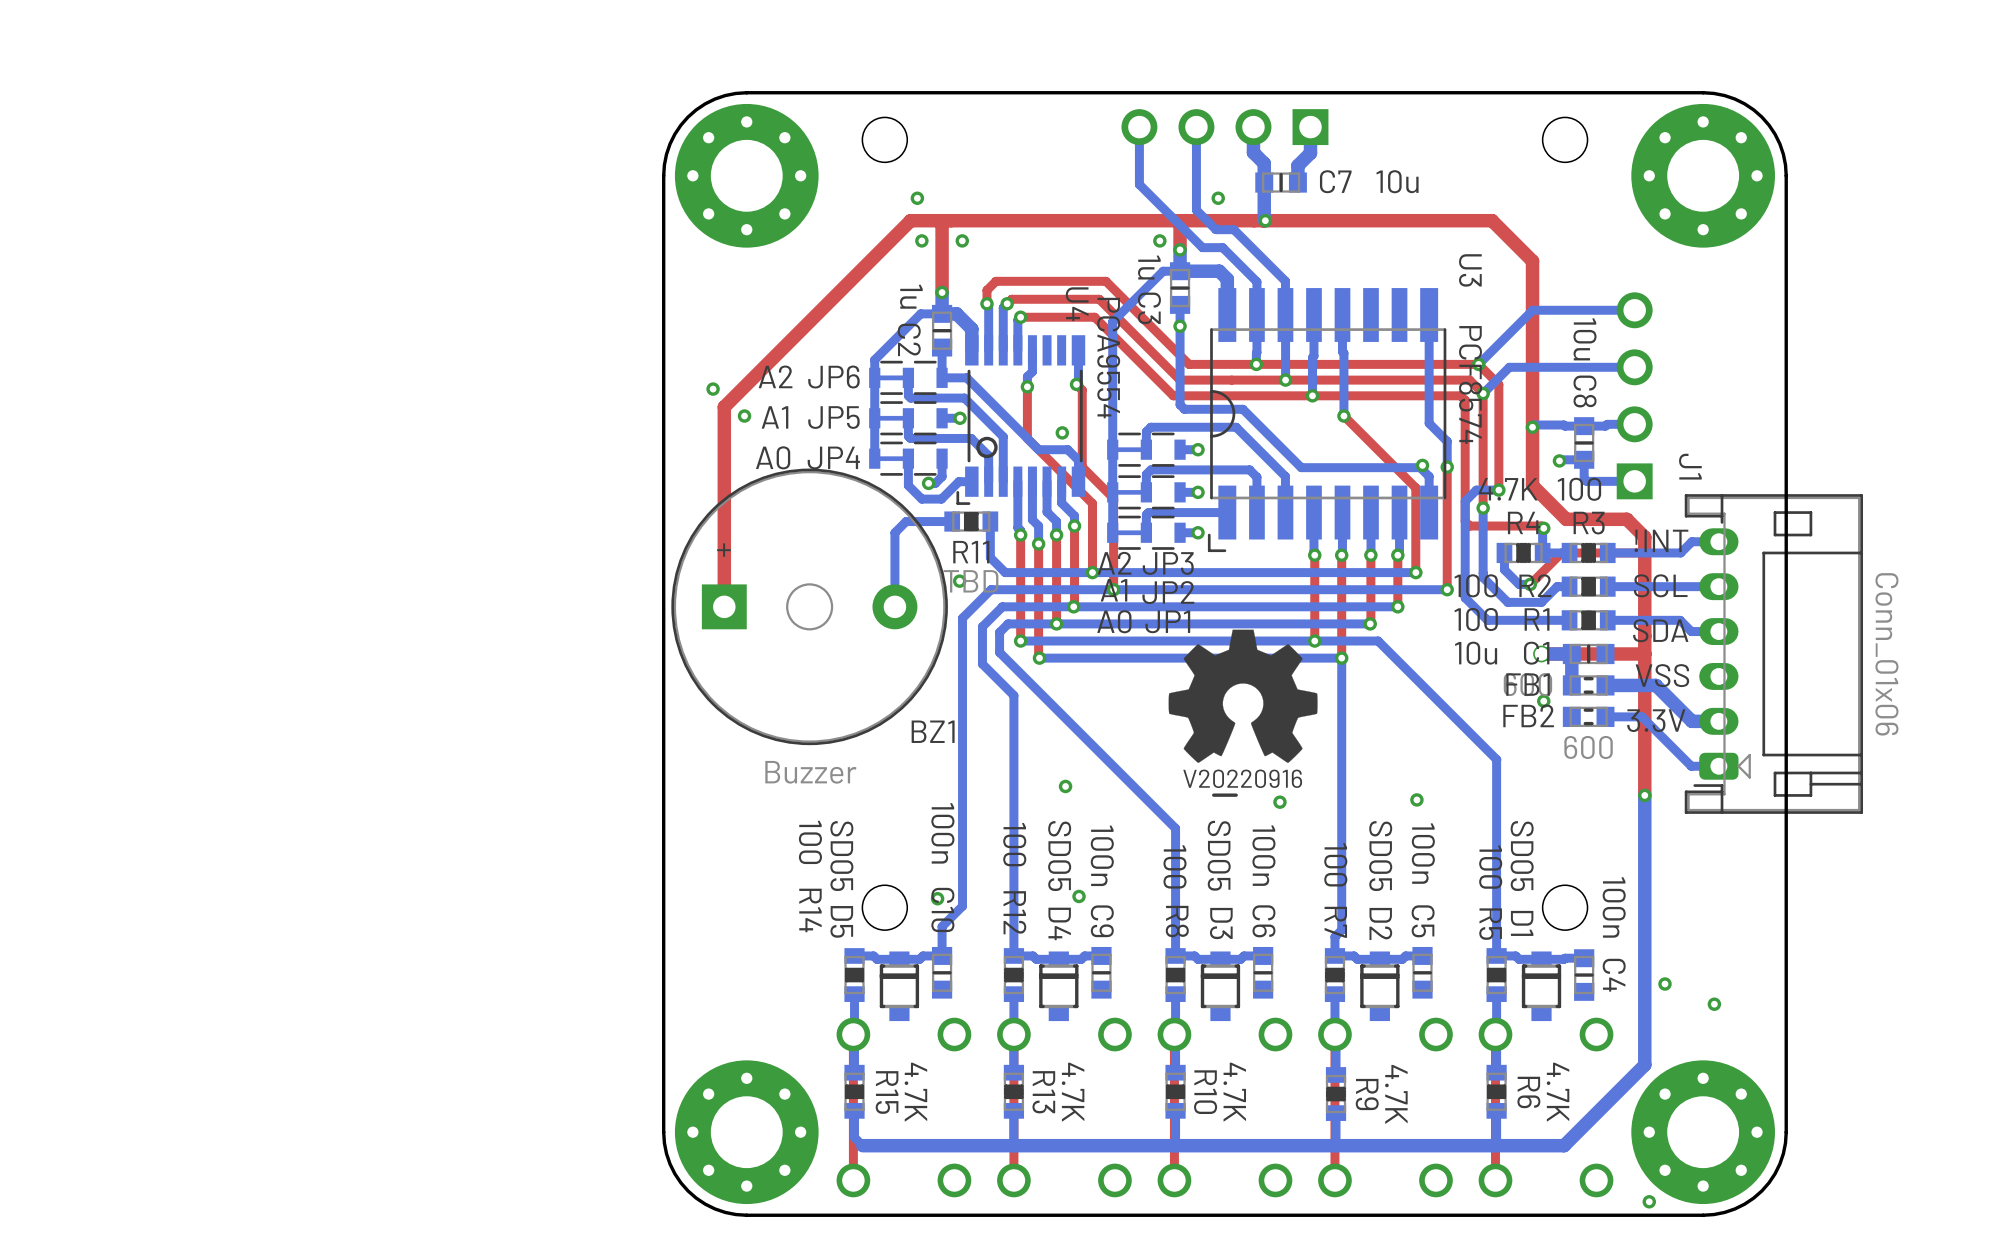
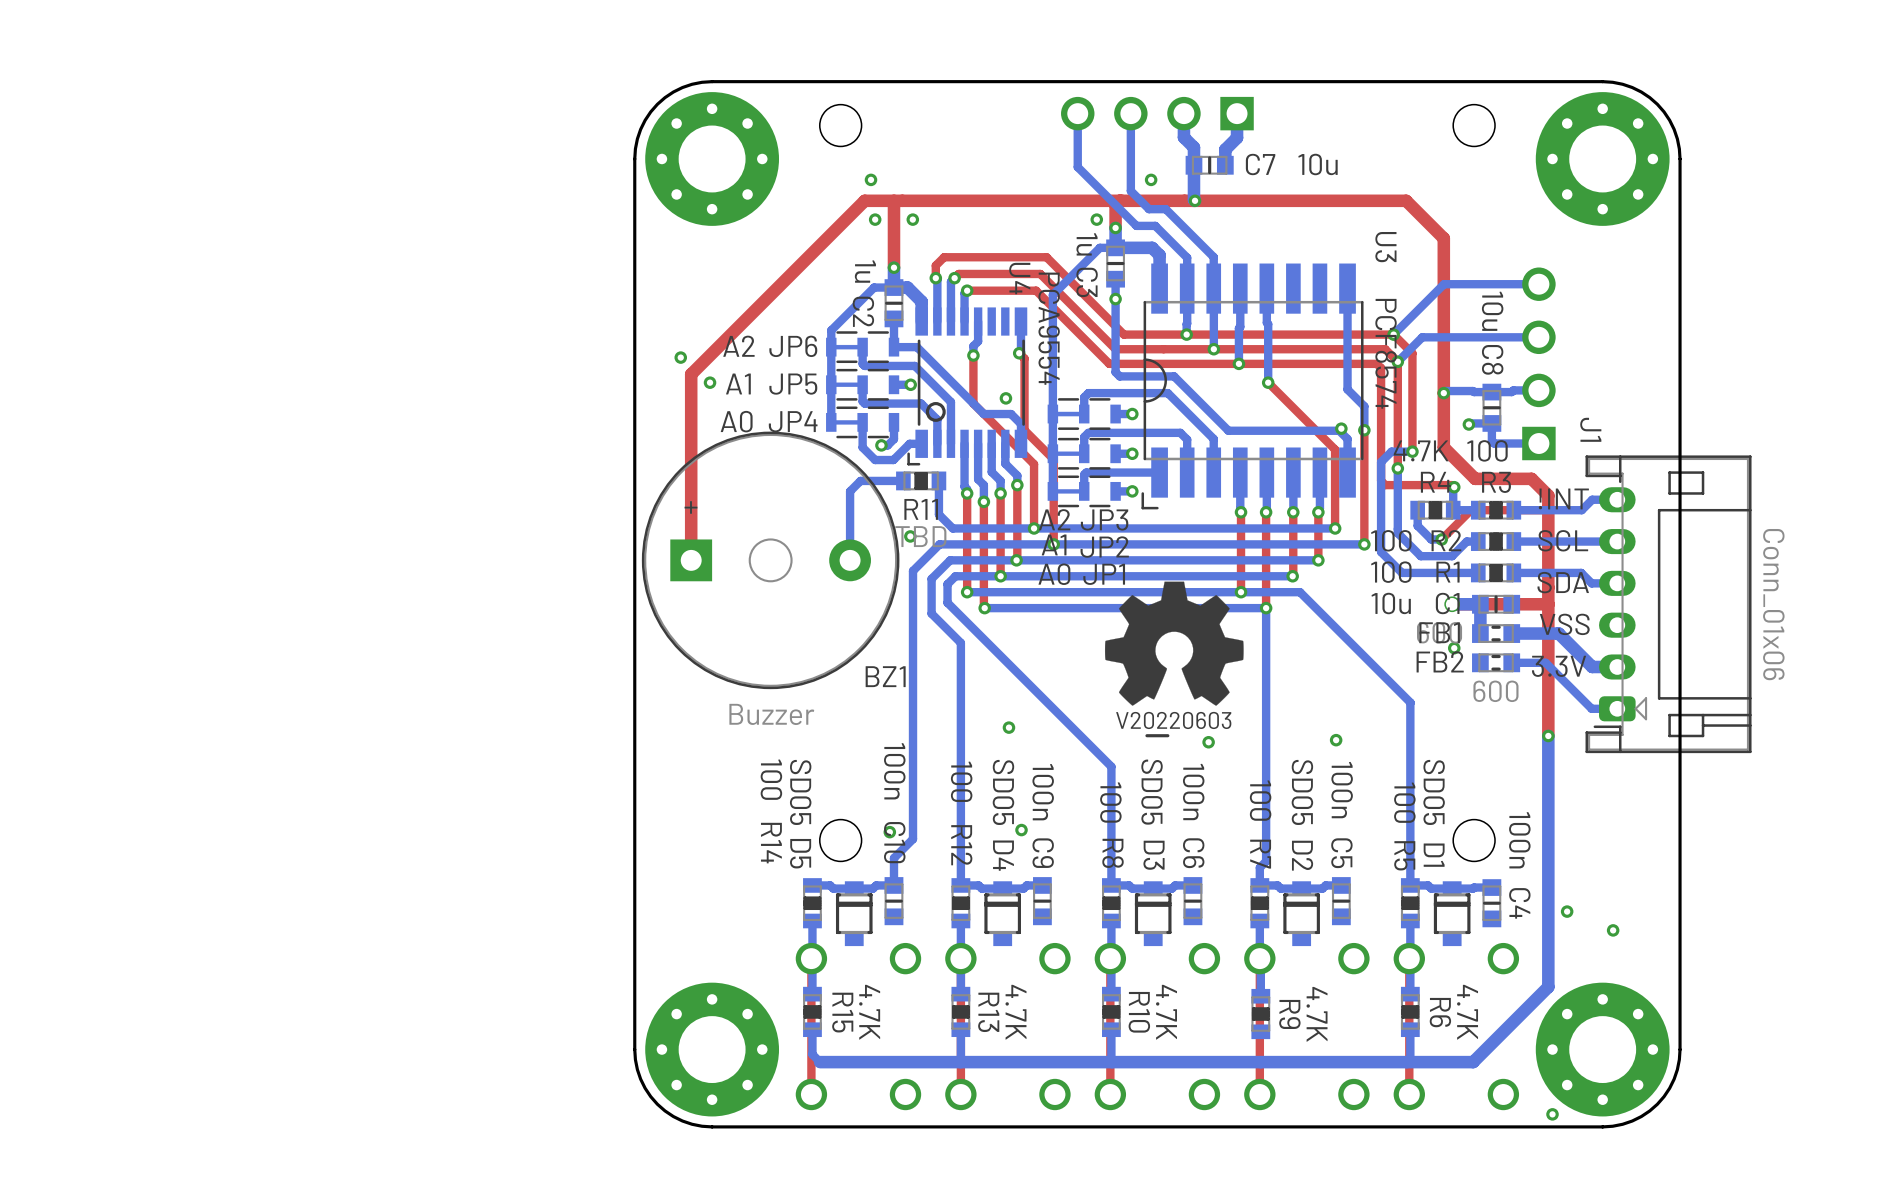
drawing shape: [1183, 769, 1303, 797] -> [1116, 711, 1232, 738]
bottom track: (1336, 1113) (1336, 1145) -> none

